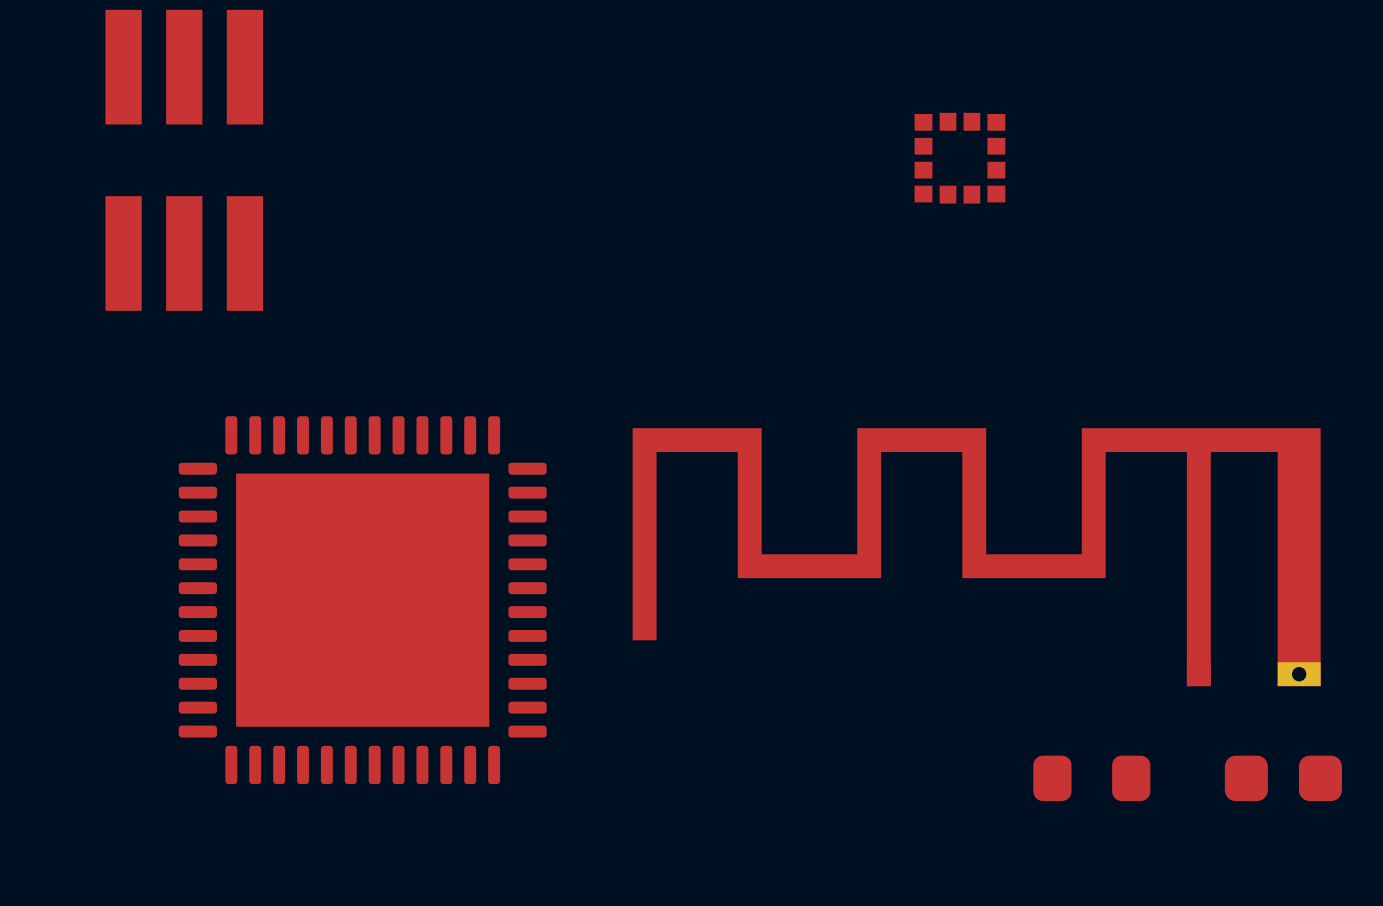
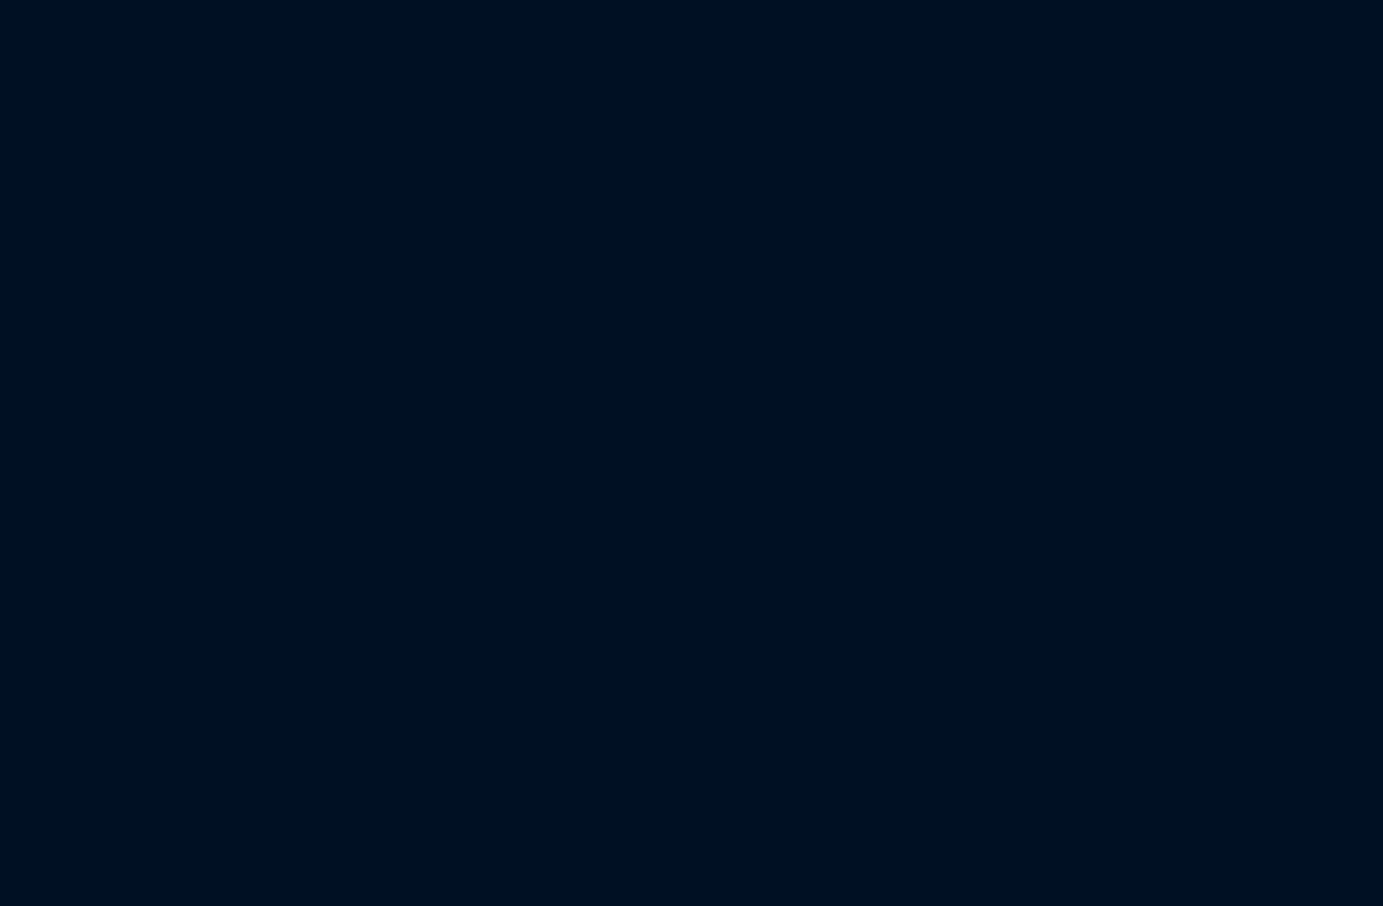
part: (959, 158) -> none
part: (184, 160) -> none
part: (976, 557) -> none
part: (362, 600) -> none
part: (1091, 778) -> none
part: (1283, 778) -> none

